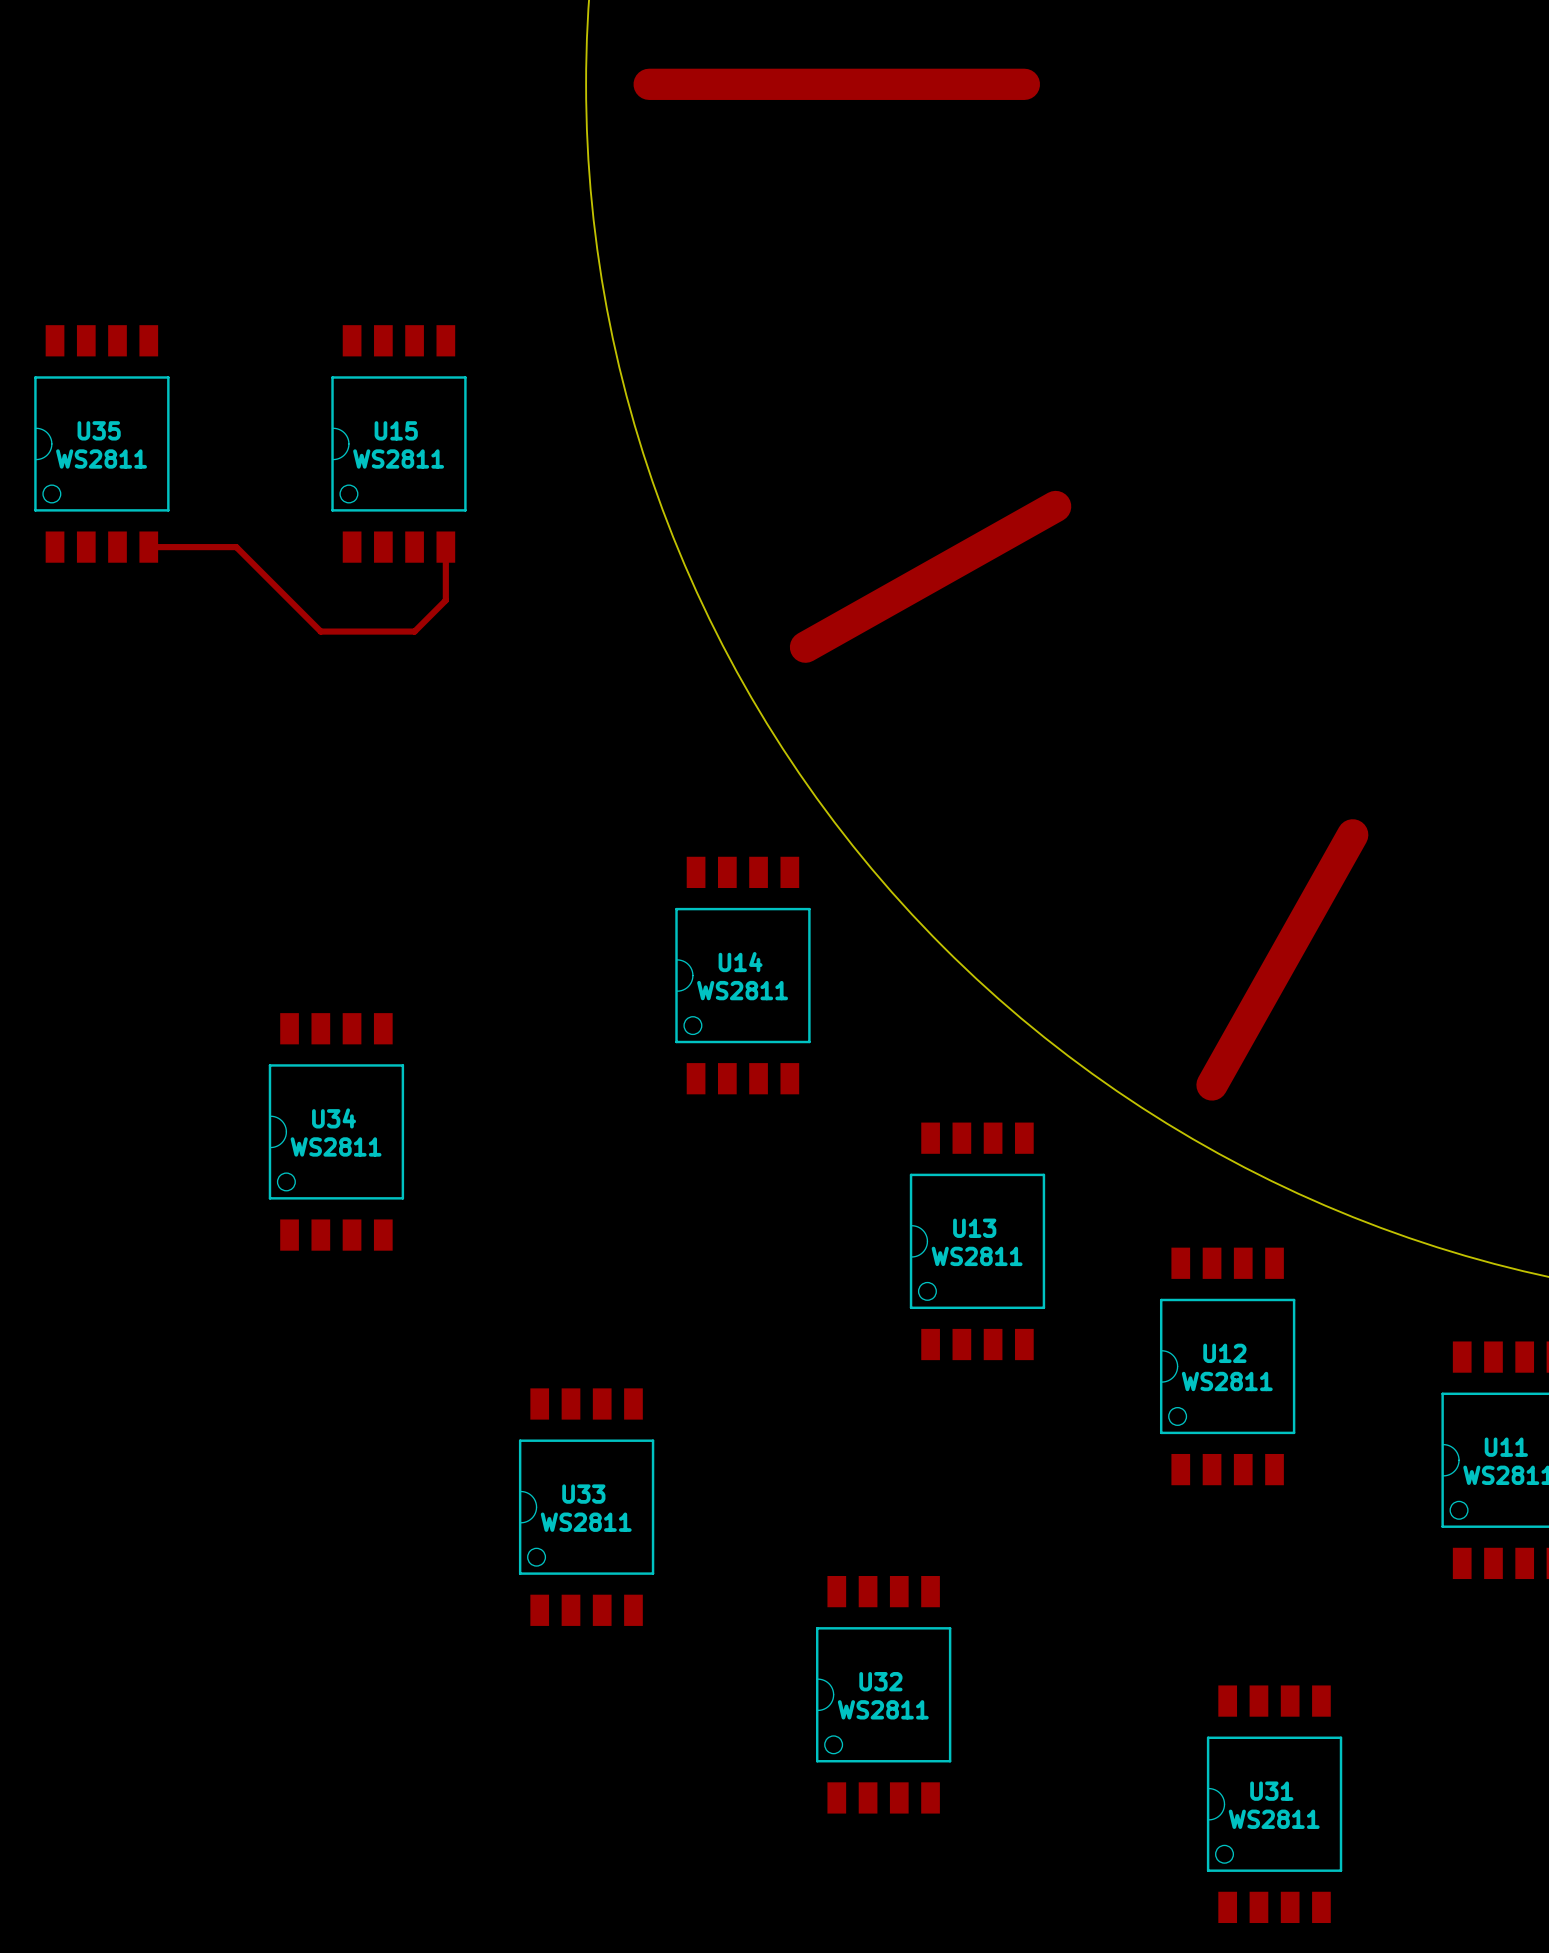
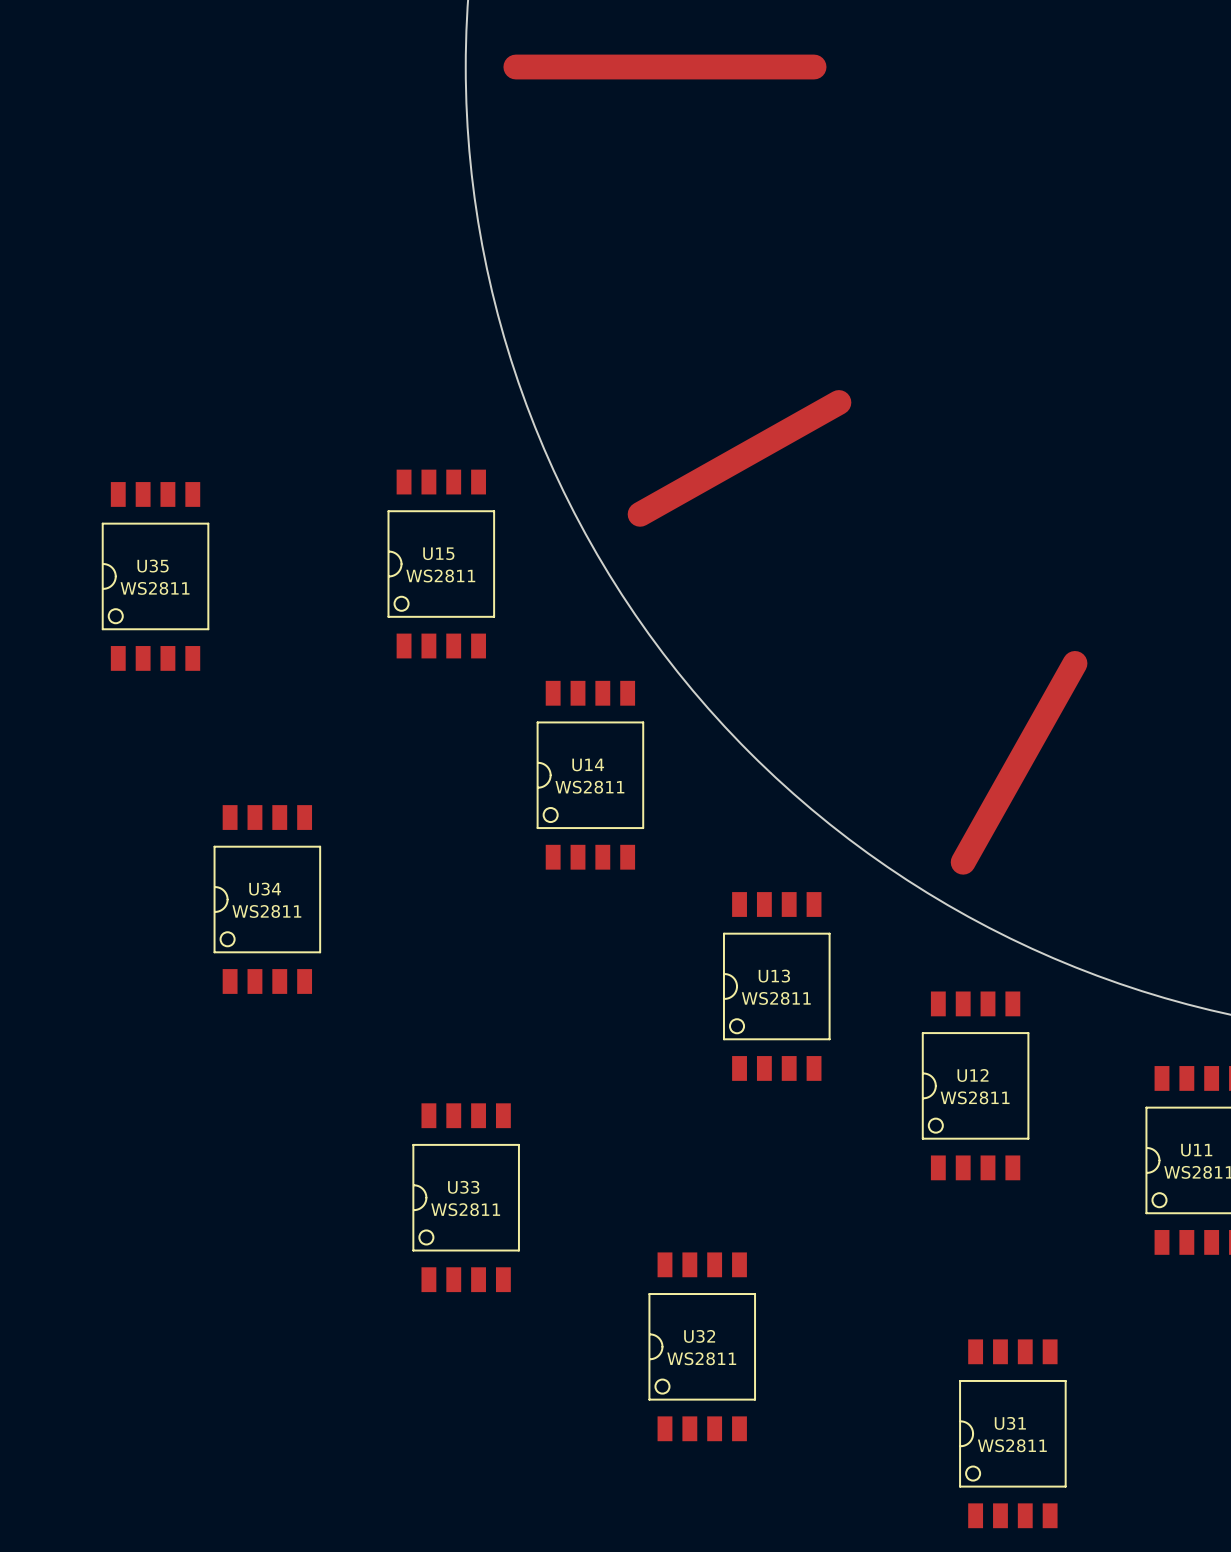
U35 position: (101, 443) -> (155, 576)
U15 position: (398, 443) -> (441, 564)
top track: (148, 547) (236, 547) (320, 631) (414, 631) (445, 600) (445, 547) -> none

